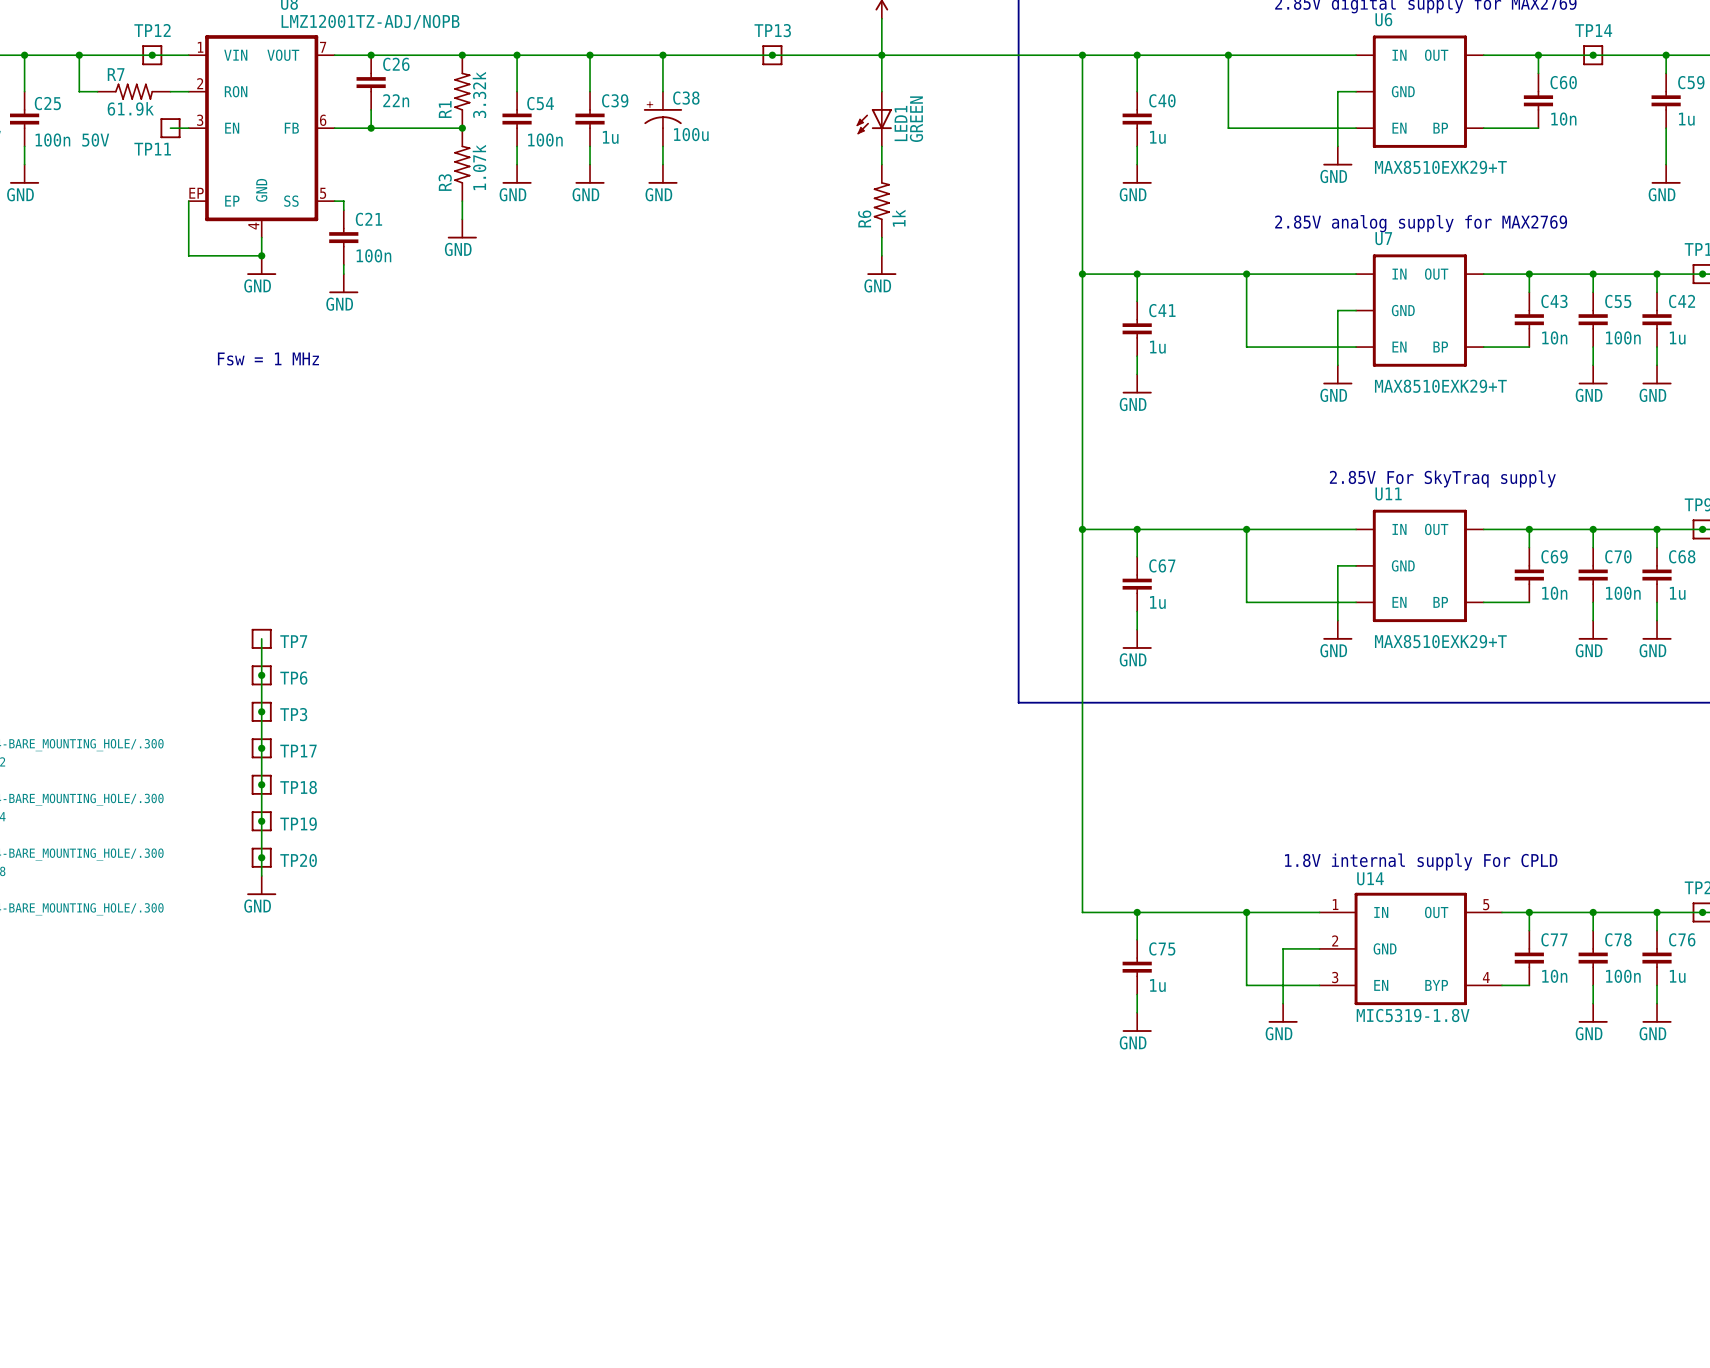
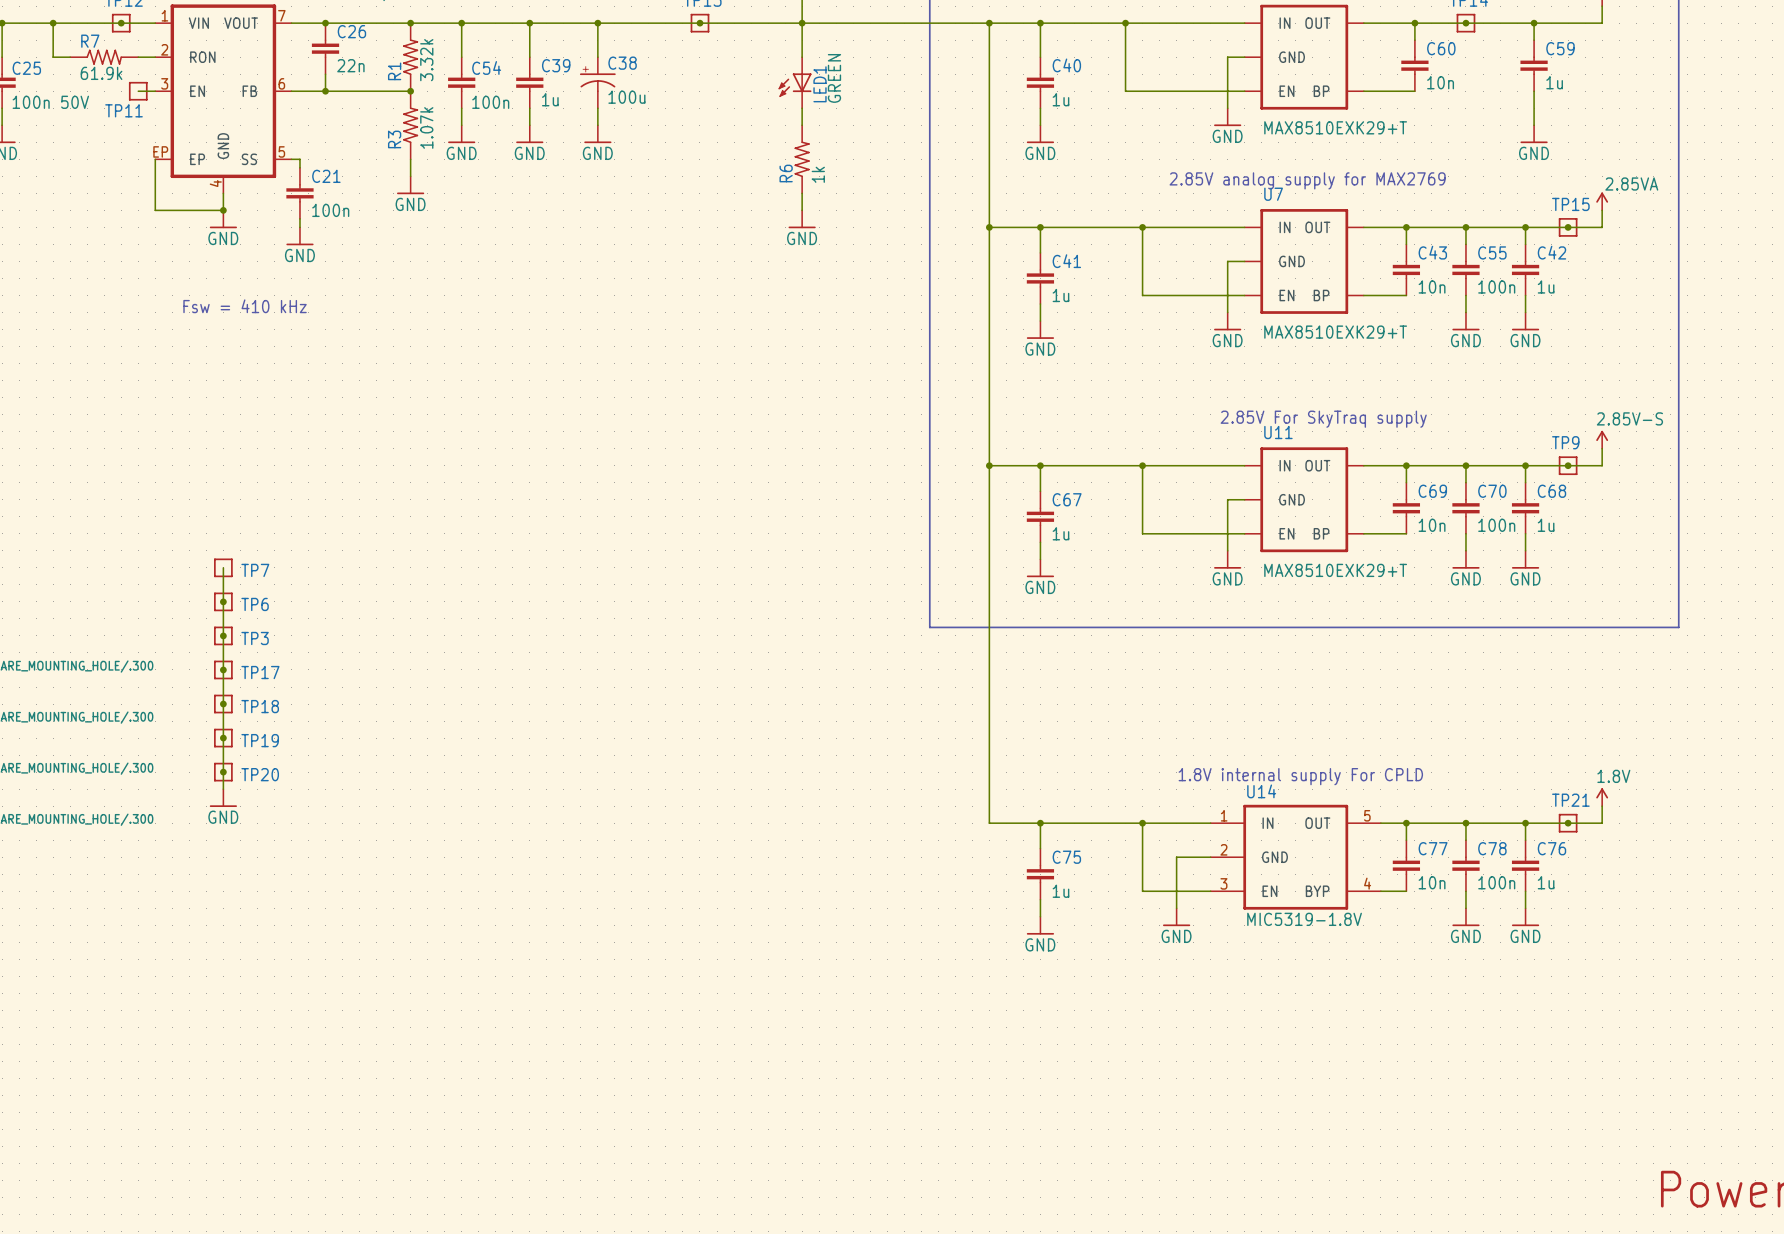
text: Fsw = 1 MHz (268, 359) -> Fsw = 410 kHz (245, 306)

